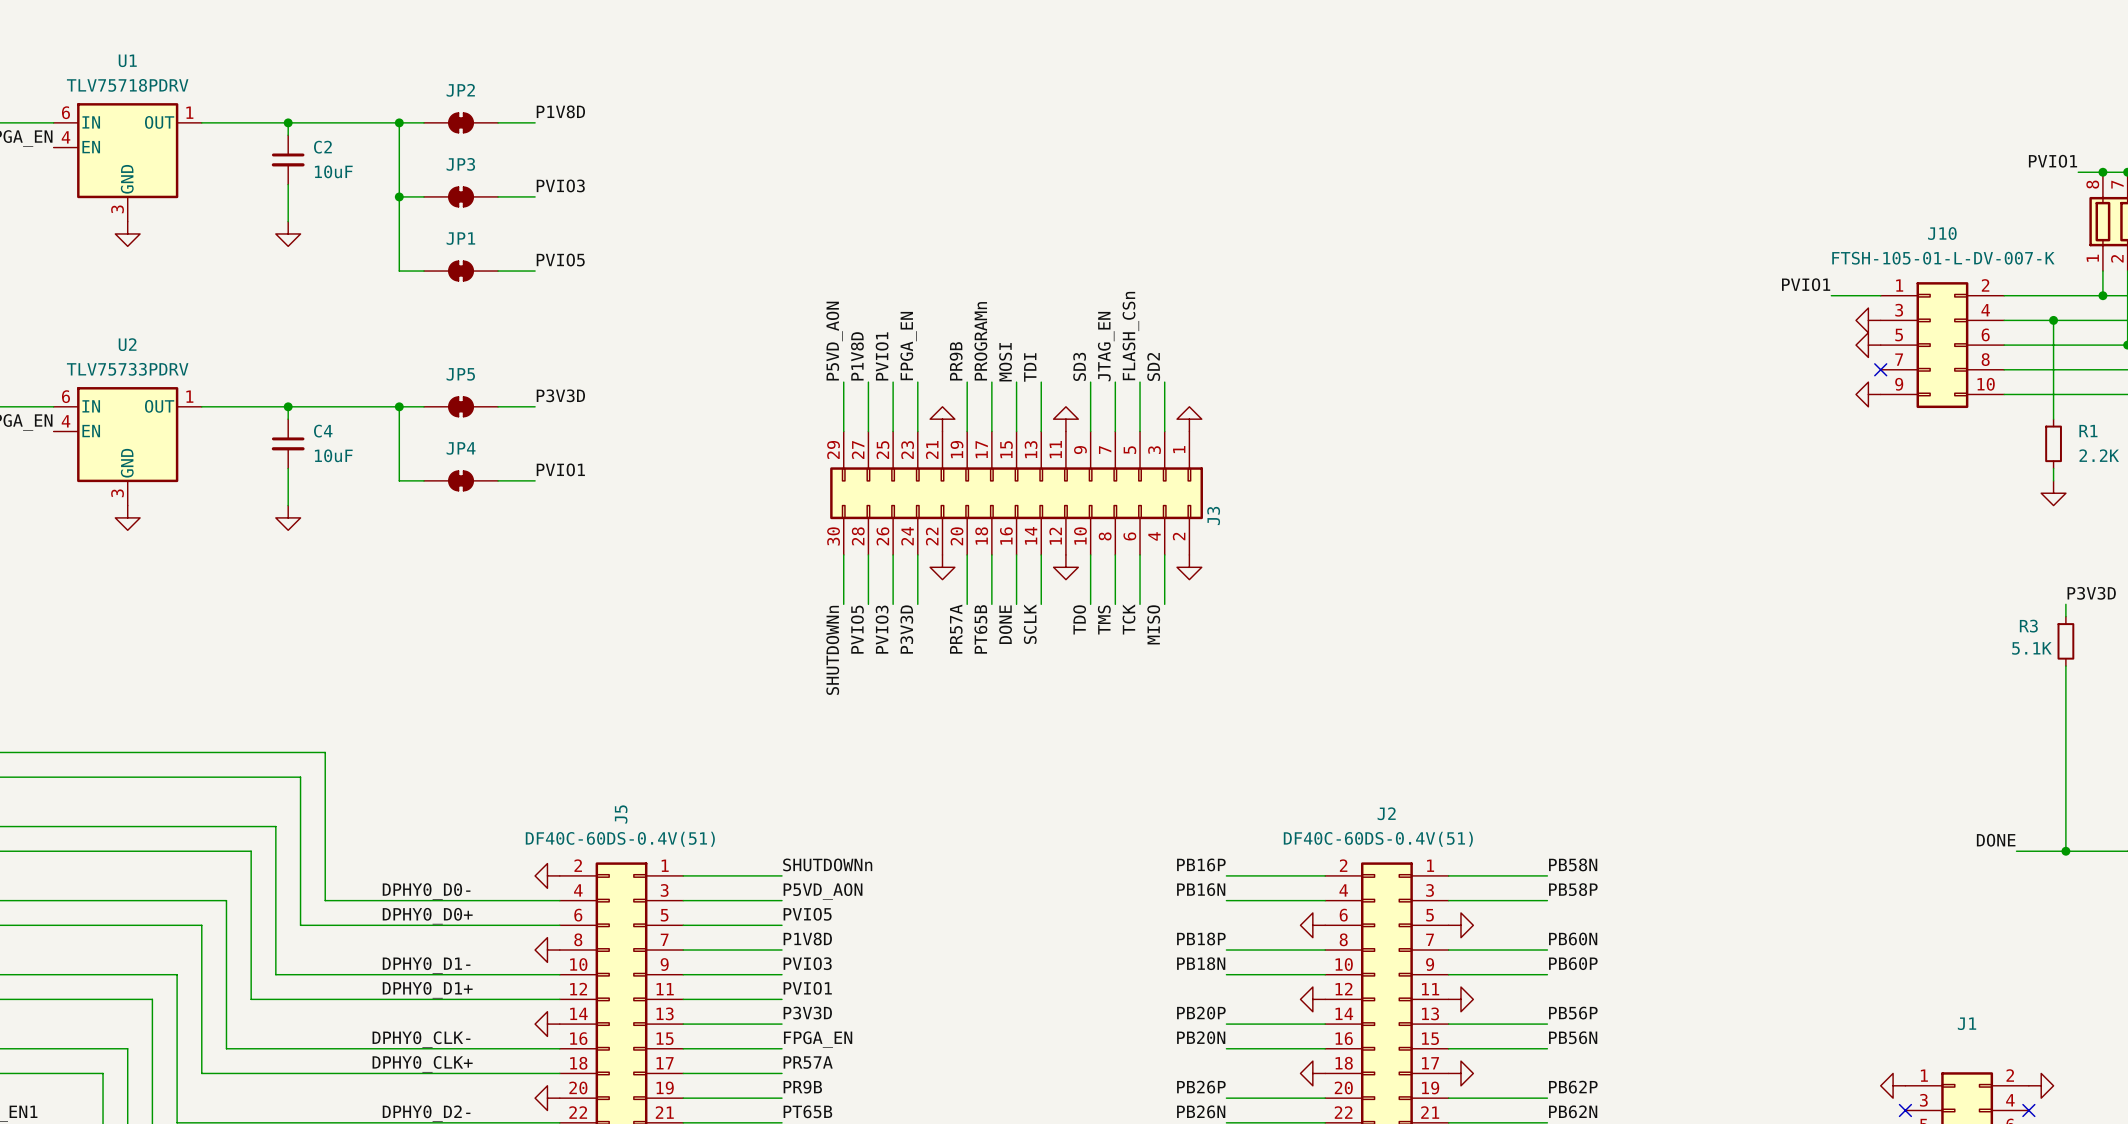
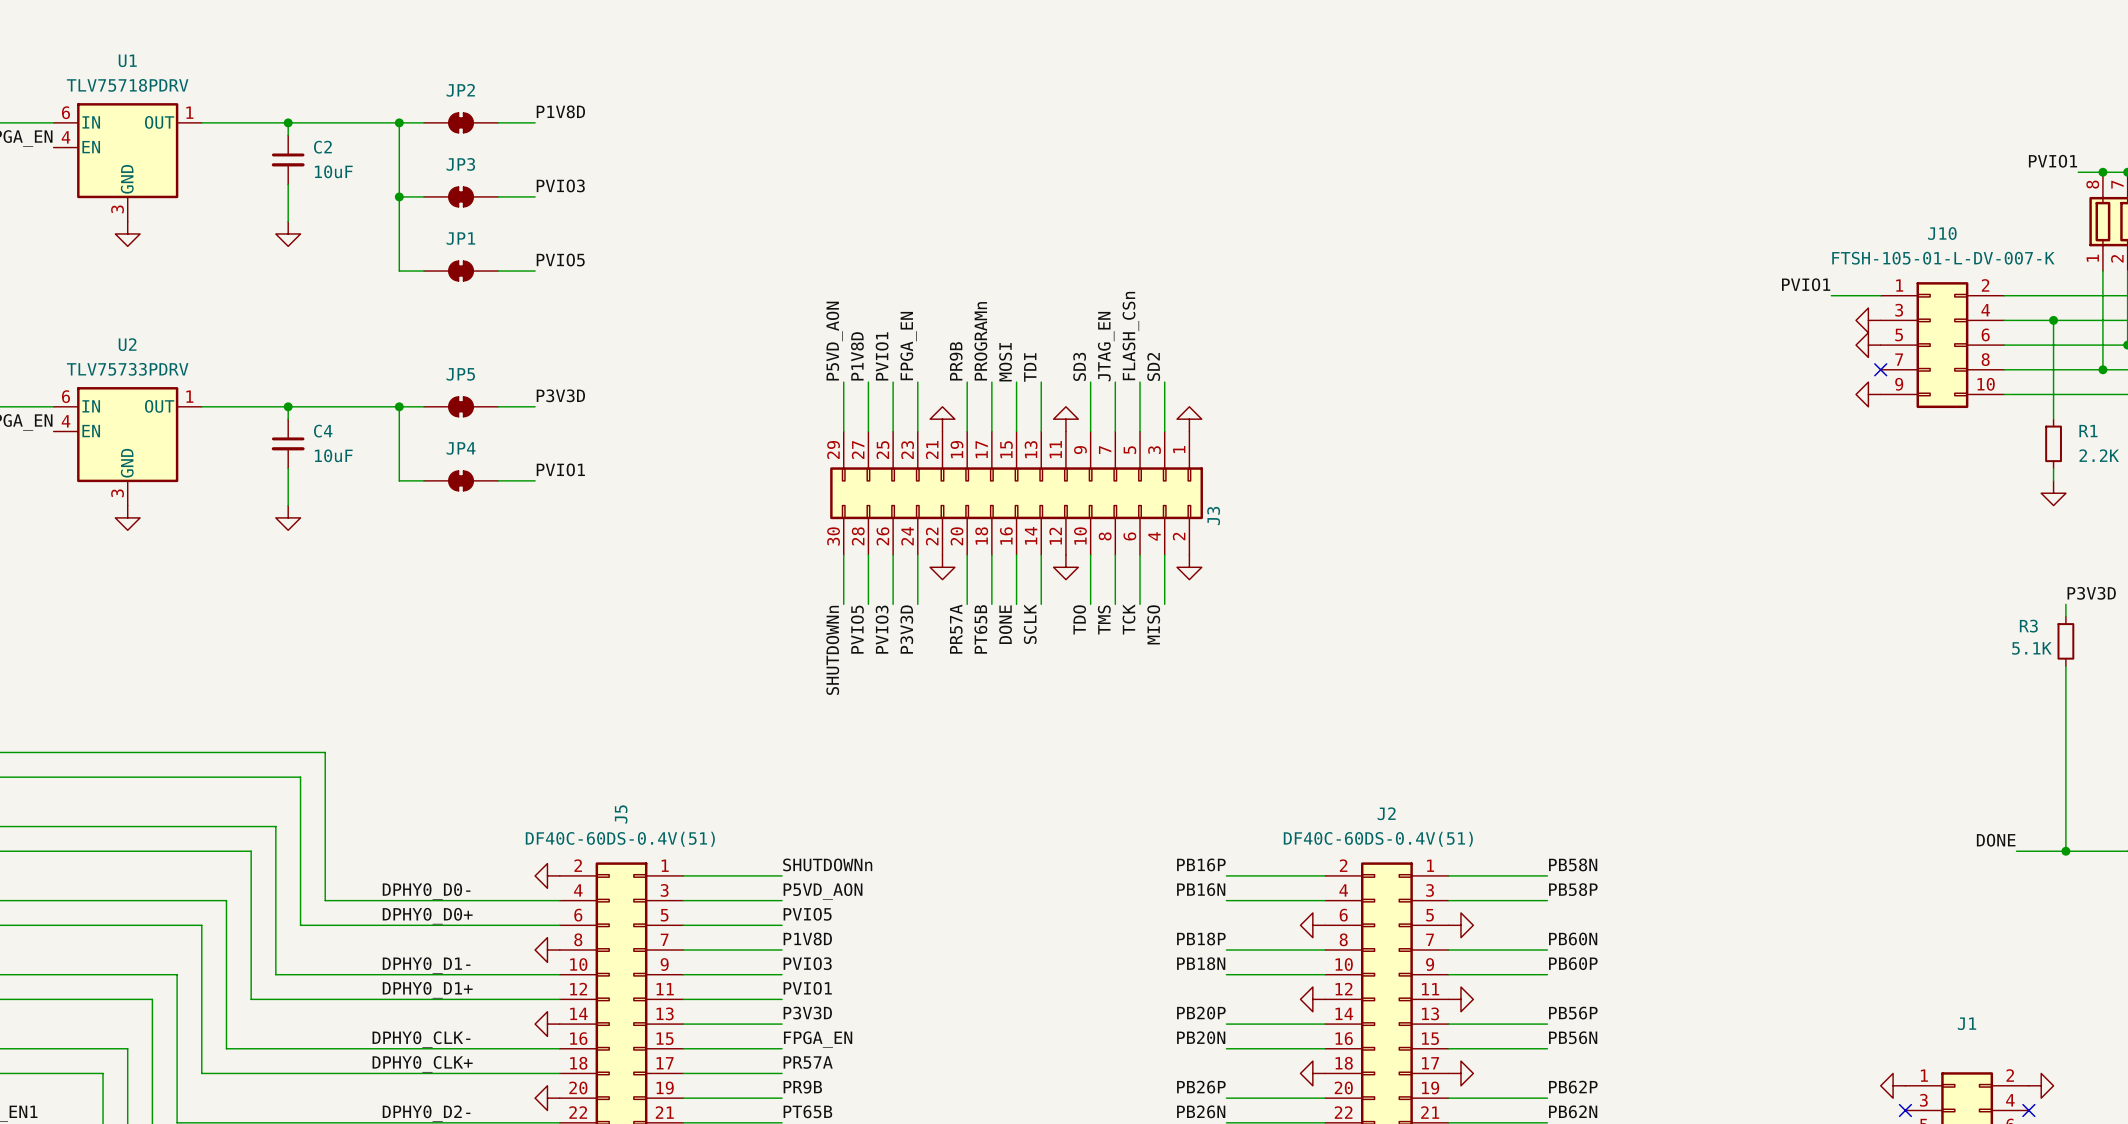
wire: none -> (2102, 295) (2102, 369)
junction: (2102, 295) -> none
junction: none -> (2102, 369)

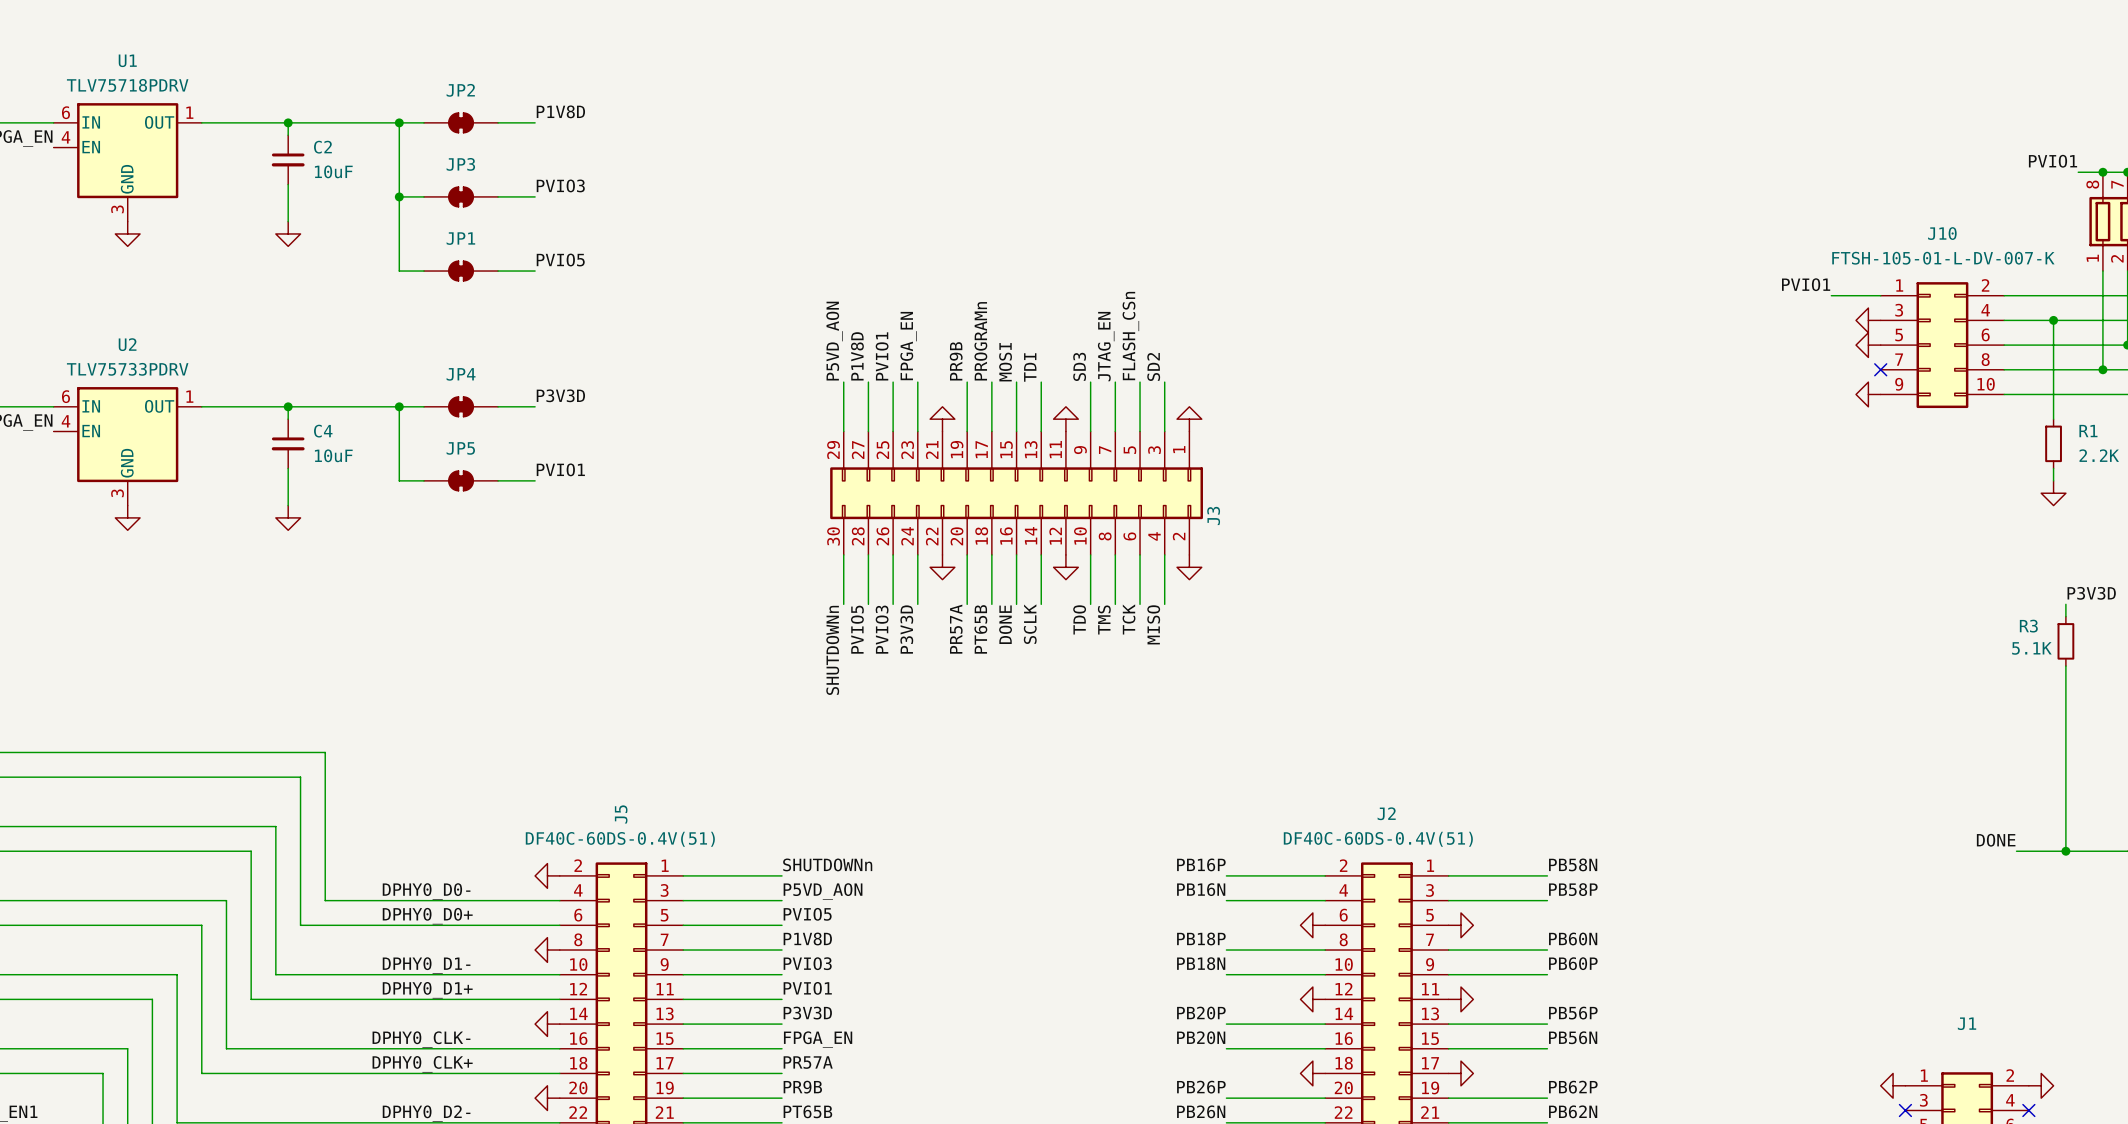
JP5 name: JP5 (460, 374) -> JP4 (461, 374)
JP4 name: JP4 (461, 448) -> JP5 (460, 448)

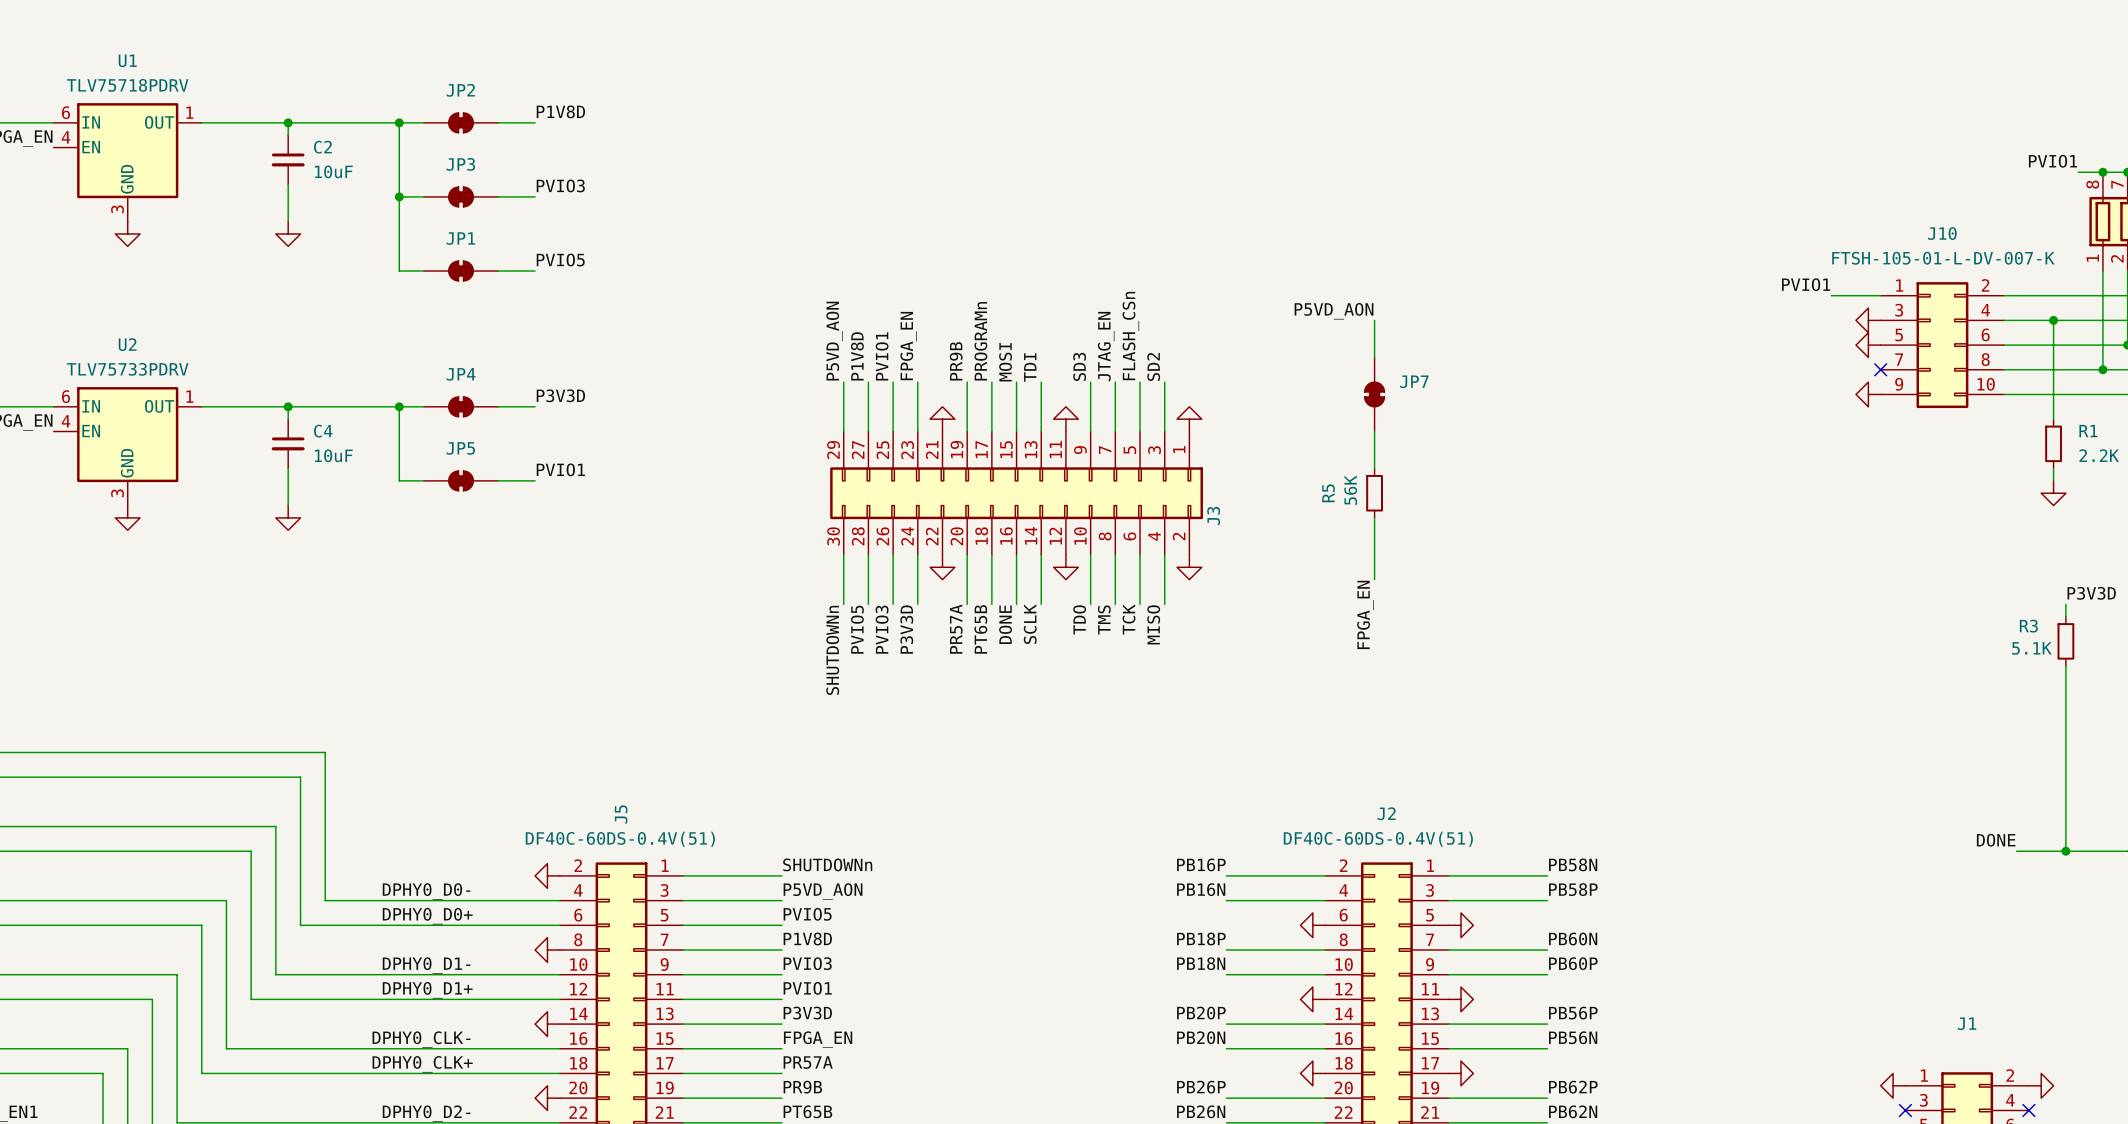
label: none -> P5VD_AON (1334, 311)
wire: none -> (1374, 320) (1374, 357)
JP7: none -> (1374, 394)
wire: none -> (1374, 431) (1374, 468)
R5: none -> 56K (1374, 493)
wire: none -> (1374, 517) (1374, 579)
label: none -> FPGA_EN (1365, 614)

